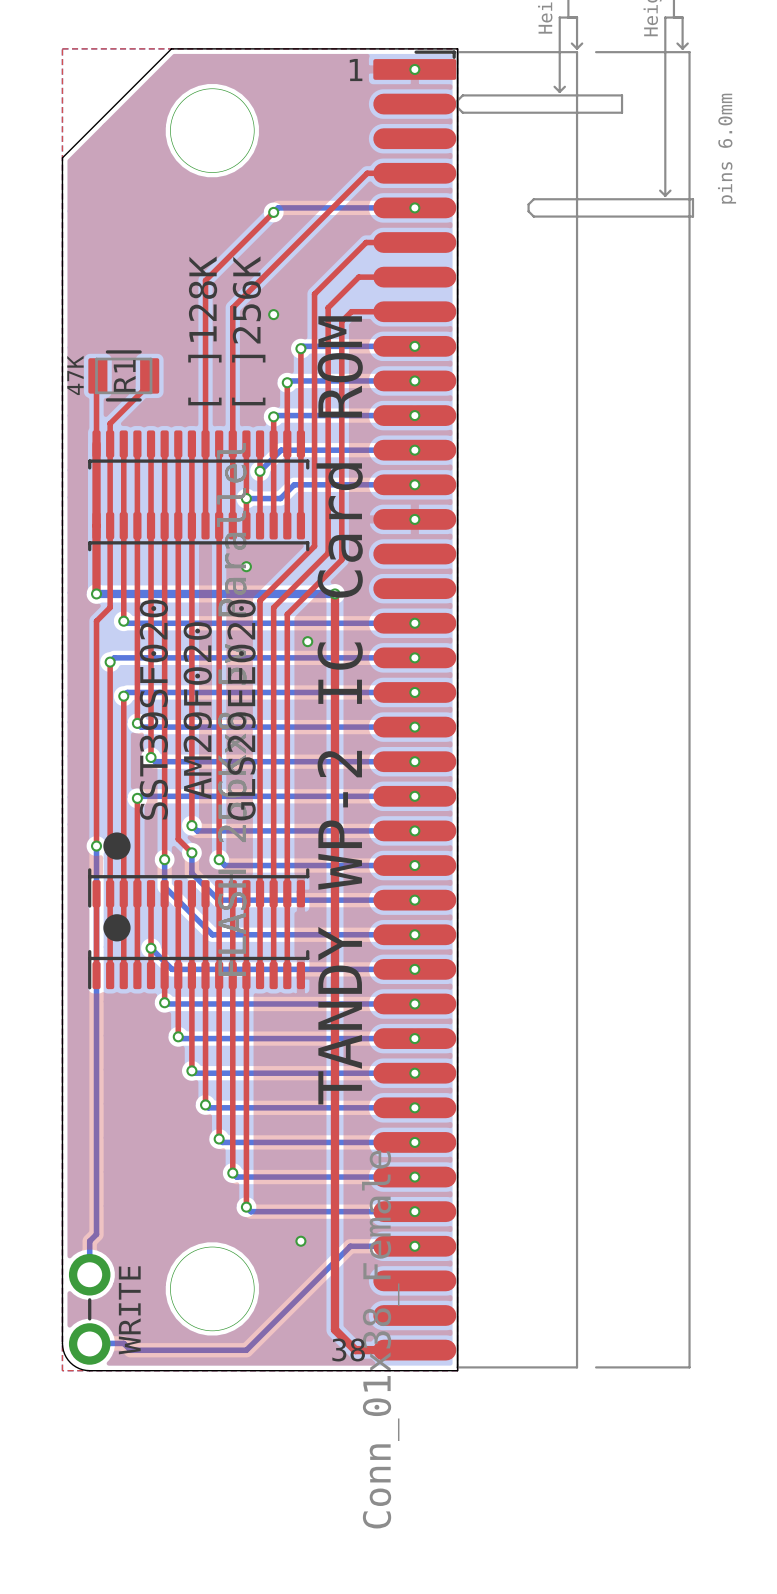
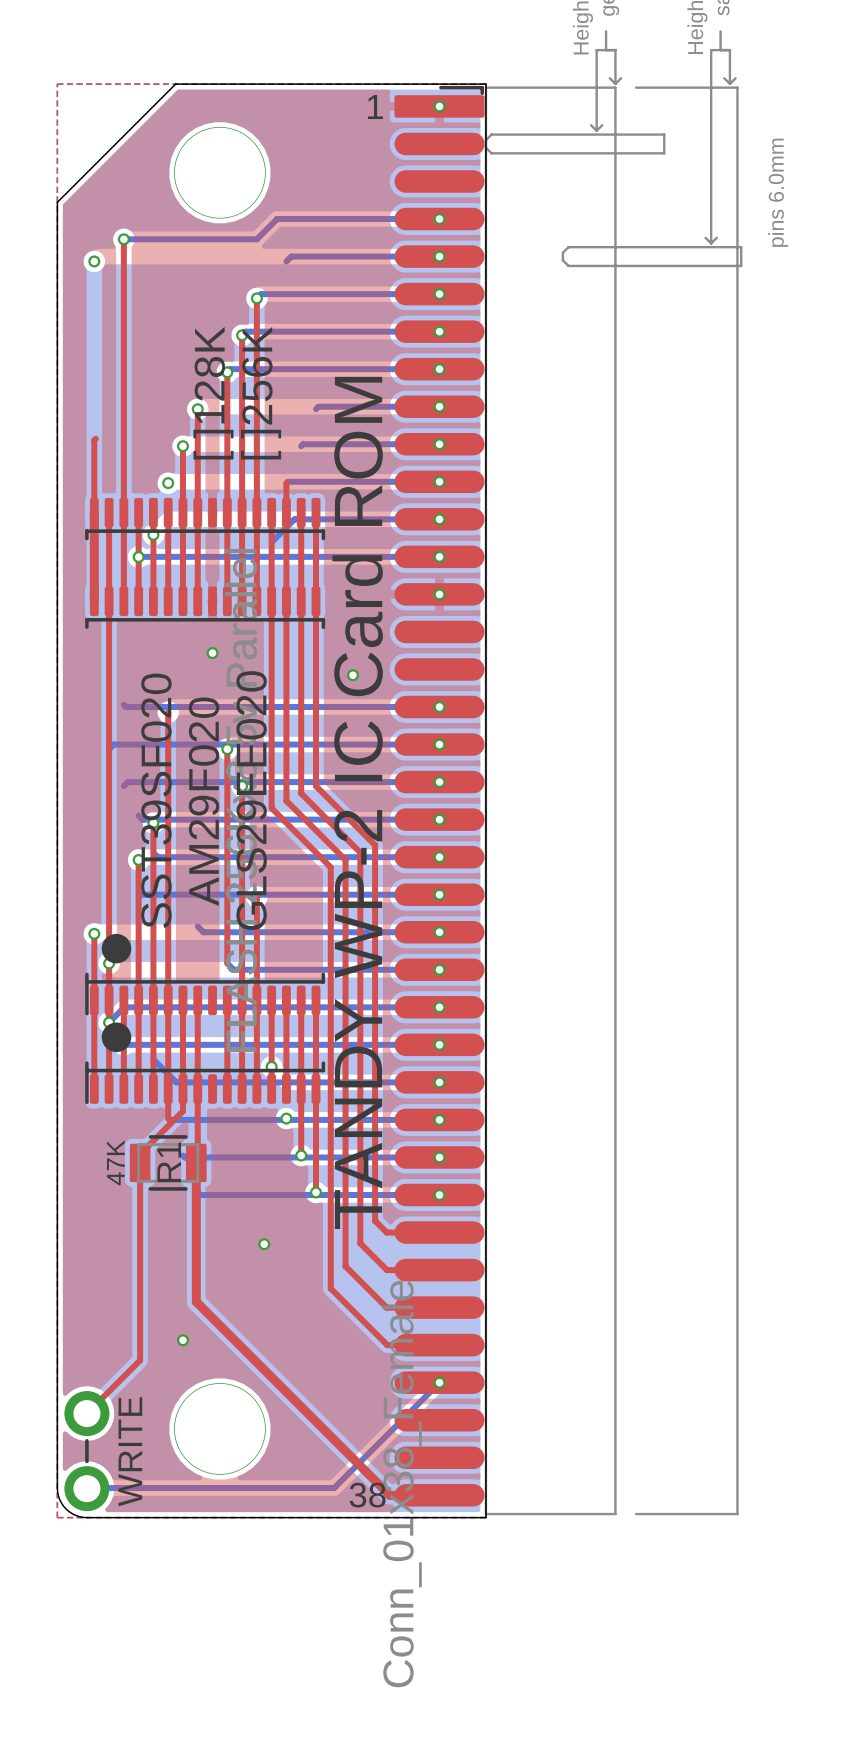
top track: (414, 173) (367, 173) (232, 307) -> (242, 335) (242, 364)
bottom track: none -> (439, 219) (277, 219) (256, 239) (123, 239)
via: none -> (439, 219)
top track: none -> (123, 239) (123, 512)
via: none -> (123, 239)
via: none -> (94, 261)
top track: (273, 212) (205, 280) (205, 525) -> none
via: (273, 212) -> none
top track: (414, 242) (366, 242) (314, 294) (314, 546) (260, 600) -> (271, 601) (271, 682)
bottom track: none -> (439, 294) (261, 294) (256, 298)
via: none -> (439, 294)
via: none -> (256, 298)
top track: (414, 277) (358, 277) (328, 307) (328, 553) (273, 607) -> (286, 601) (286, 690)
bottom track: none -> (439, 331) (245, 331) (242, 335)
via: none -> (439, 331)
via: none -> (242, 335)
top track: (414, 311) (351, 311) (341, 321) (341, 559) (287, 614) -> (301, 601) (301, 697)
bottom track: none -> (439, 369) (230, 369) (227, 372)
via: none -> (439, 369)
top track: none -> (227, 372) (227, 512)
via: none -> (227, 372)
via: (273, 314) -> none
via: none -> (197, 409)
top track: (300, 348) (300, 444) -> (197, 409) (197, 512)
via: (300, 348) -> none
R1 position: (123, 375) -> (168, 1162)
top track: (149, 375) (149, 384) (110, 423) (110, 444) -> none
via: none -> (182, 446)
top track: (287, 382) (287, 444) -> (182, 446) (182, 512)
via: (287, 382) -> none
via: none -> (168, 483)
via: (273, 416) -> none
via: none -> (153, 534)
via: (260, 471) -> none
via: none -> (138, 557)
bottom track: (294, 484) (280, 498) (246, 498) -> (308, 556) (138, 556)
via: (246, 498) -> none
top track: (96, 525) (96, 593) -> none
top track: (123, 525) (123, 621) -> (256, 896) (256, 1000)
top track: (137, 525) (137, 723) -> (256, 298) (256, 512)
top track: (151, 525) (151, 730) -> none
top track: (164, 525) (164, 628) -> none
top track: (178, 525) (178, 839) (191, 852) -> none
top track: (191, 525) (191, 825) -> none
top track: (219, 525) (219, 662) -> (153, 852) (153, 1000)
top track: none -> (315, 601) (315, 786) (375, 845) (375, 1220) (386, 1232) (439, 1232)
via position: (246, 566) -> (212, 653)
bottom track: (96, 593) (334, 593) -> none
via: (96, 593) -> none
top track: (334, 593) (334, 1329) (355, 1350) (368, 1350) -> none
top track: (110, 607) (96, 621) (96, 832) -> (109, 690) (109, 749)
via: (123, 621) -> none
via: (307, 641) -> none
via: (110, 662) -> none
via: none -> (227, 749)
top track: (123, 696) (123, 893) -> (242, 786) (242, 1000)
via: (123, 696) -> none
via: none -> (242, 786)
top track: (287, 702) (287, 893) -> (301, 793) (360, 852) (360, 1243) (387, 1270) (439, 1270)
top track: (273, 709) (273, 893) -> (286, 800) (345, 859) (345, 1266) (386, 1307) (439, 1307)
top track: (260, 716) (260, 893) -> (271, 808) (330, 867) (330, 1288) (387, 1345) (439, 1345)
via: (137, 723) -> none
via: none -> (153, 823)
via: (151, 757) -> none
top track: none -> (138, 859) (138, 896)
via: none -> (138, 859)
via: (137, 798) -> none
via: (191, 825) -> none
via: none -> (94, 933)
top track: none -> (94, 948) (94, 1000)
bottom track: (96, 846) (96, 1234) (89, 1241) (89, 1274) -> none
via: (96, 846) -> none
bottom track: (191, 852) (191, 873) (218, 900) -> (109, 1022) (124, 1007) (226, 1007)
via: (191, 852) -> none
via: none -> (109, 963)
top track: none -> (168, 963) (168, 1000)
bottom track: (164, 859) (164, 886) (212, 934) -> (124, 1044) (220, 1044)
via: (164, 859) -> none
via: (219, 859) -> none
top track: (205, 893) (205, 1104) -> none
top track: none -> (315, 1000) (315, 1192)
via: none -> (109, 1022)
via: (151, 948) -> none
via: none -> (271, 1066)
top track: (219, 975) (219, 1139) -> none
top track: (232, 975) (232, 1173) -> none
top track: (246, 975) (246, 1207) -> none
top track: none -> (301, 1089) (301, 1155)
top track: (178, 995) (178, 1036) -> (182, 1111) (140, 1154) (140, 1360) (86, 1413)
via: (164, 1002) -> none
via: none -> (286, 1118)
via: (178, 1036) -> none
via: none -> (301, 1155)
top track: (191, 1042) (191, 1070) -> (197, 1161) (196, 1301) (389, 1495)
via: (191, 1070) -> none
via: none -> (315, 1192)
bottom track: (205, 1104) (208, 1107) (414, 1107) -> none
via: (205, 1104) -> none
via: (414, 1107) -> none
via: none -> (264, 1244)
bottom track: (219, 1139) (222, 1142) (414, 1142) -> none
via: (219, 1139) -> none
via: (414, 1142) -> none
bottom track: (232, 1173) (236, 1177) (414, 1177) -> none
via: (232, 1173) -> none
via: (414, 1177) -> none
via: none -> (182, 1340)
bottom track: (246, 1207) (250, 1211) (414, 1211) -> none
via: (246, 1207) -> none
via: (414, 1211) -> none
via: (300, 1241) -> none
bottom track: (414, 1246) (350, 1246) (246, 1350) (130, 1350) (123, 1343) -> (439, 1382) (334, 1488) (123, 1488)

